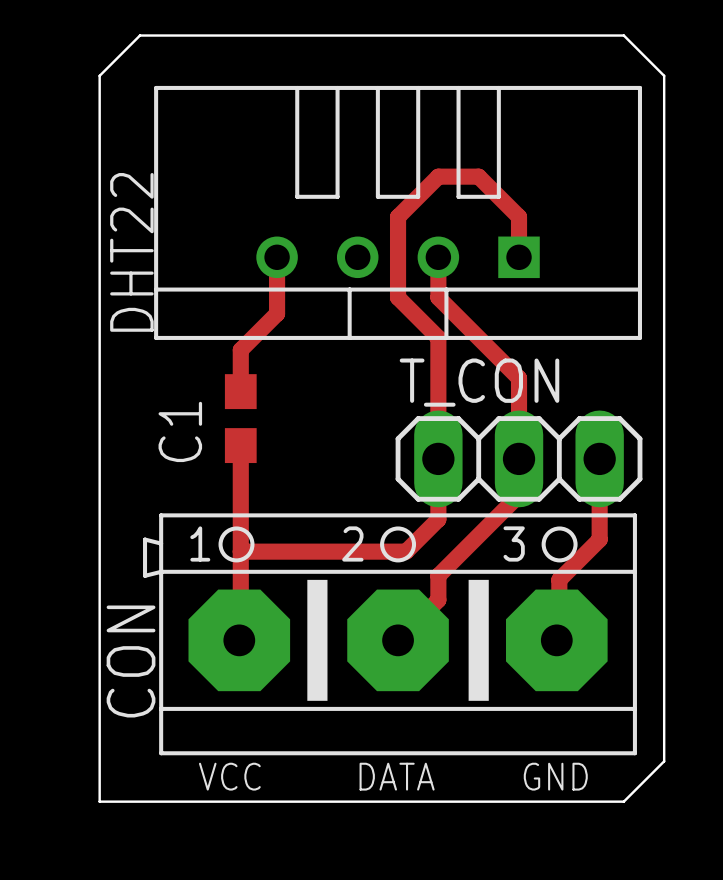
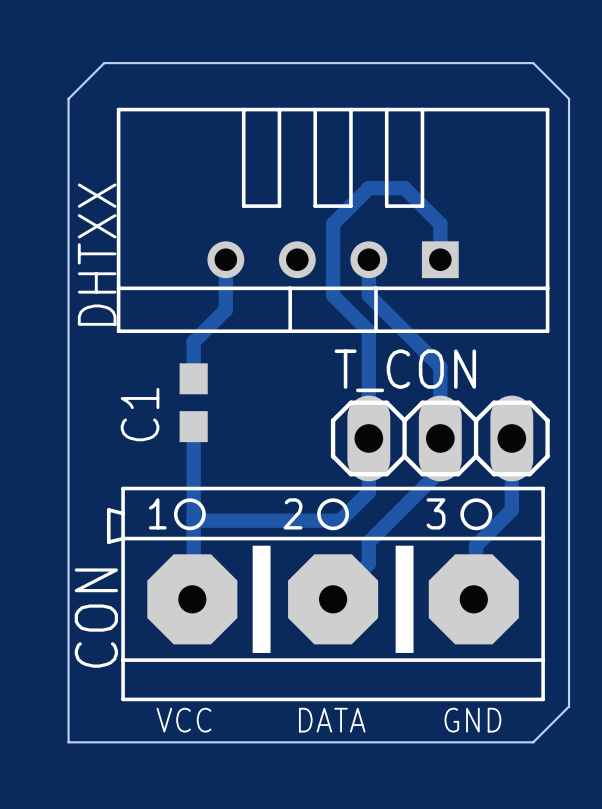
DHT22 name: DHT22 (131, 252) -> DHTXX (97, 254)

